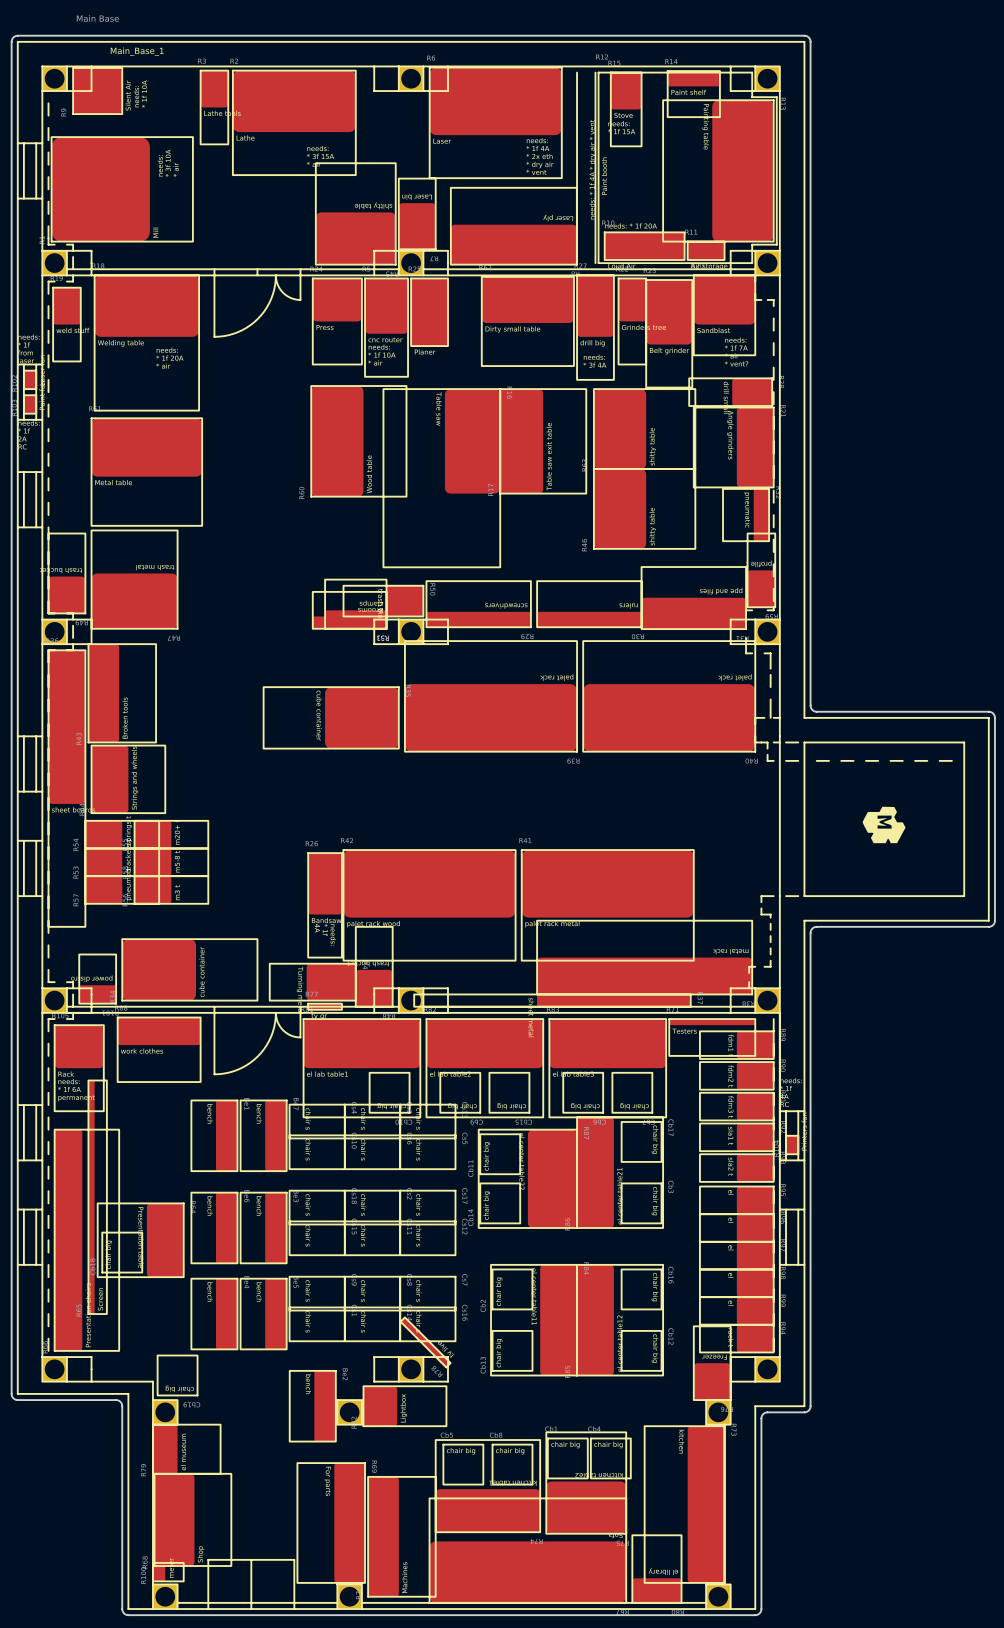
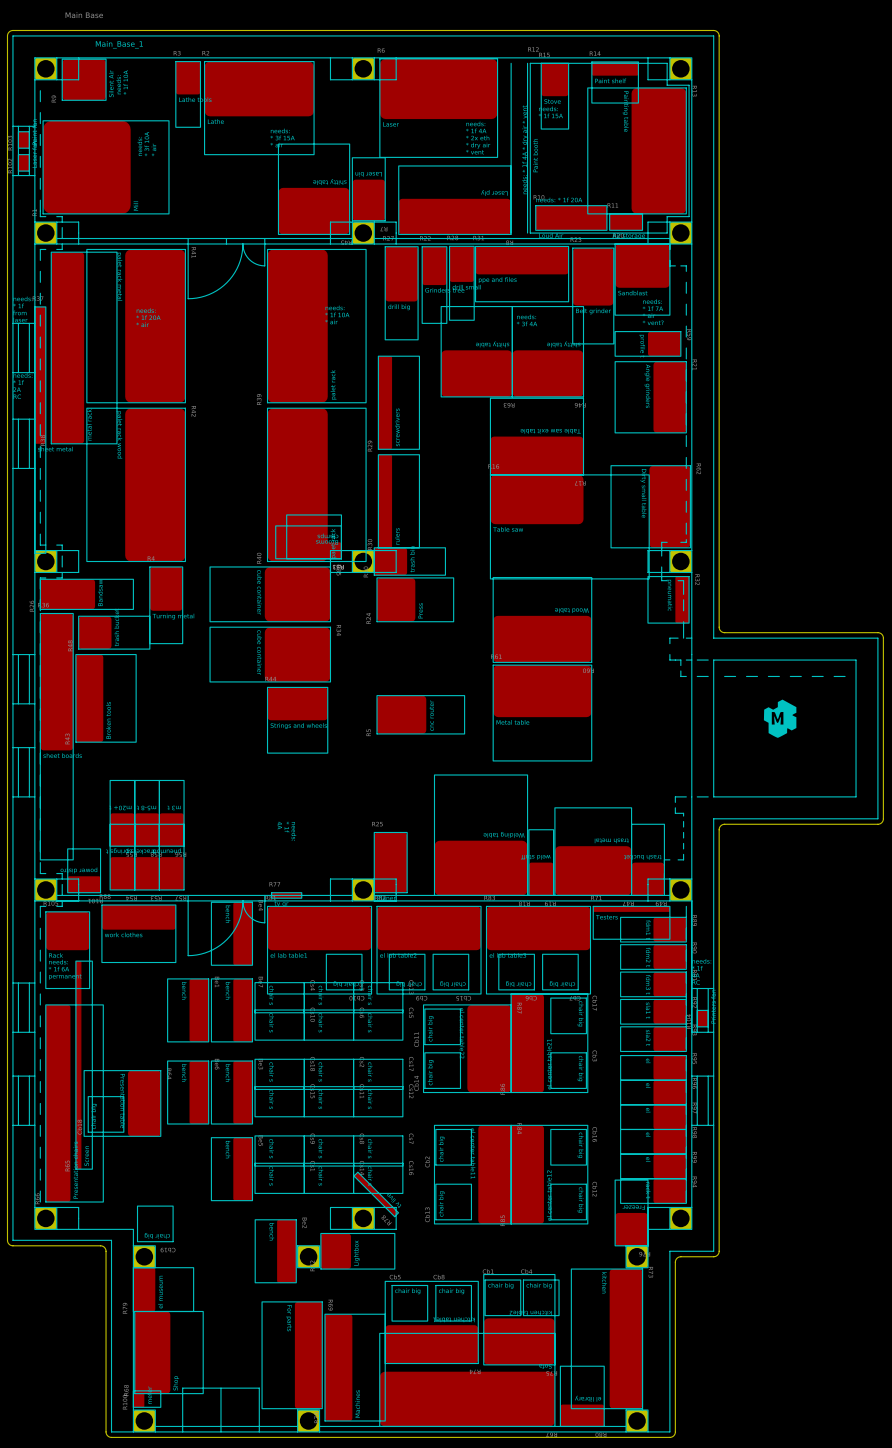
part position: (429, 312) -> (390, 862)
part rotation: 0° (337, 321) -> 90° counterclockwise (415, 599)
part position: (337, 321) -> (415, 599)
part rotation: 0° (527, 321) -> 90° clockwise (650, 506)
part position: (527, 321) -> (650, 506)
part position: (632, 321) -> (434, 285)
part rotation: 0° (66, 324) -> 180° (541, 862)
part position: (66, 324) -> (541, 862)
part rotation: 0° (386, 327) -> 90° counterclockwise (420, 714)
part position: (386, 327) -> (420, 714)
part position: (595, 327) -> (401, 293)
part rotation: 0° (146, 343) -> 180° (481, 835)
part position: (146, 343) -> (481, 835)
part position: (30, 379) -> (23, 162)
part rotation: 0° (730, 392) -> 90° counterclockwise (461, 283)
part position: (730, 392) -> (461, 283)
part position: (30, 404) -> (23, 139)
part rotation: 0° (644, 429) -> 90° counterclockwise (476, 351)
part position: (644, 429) -> (476, 351)
part rotation: 0° (358, 441) -> 90° counterclockwise (542, 619)
part position: (358, 441) -> (542, 619)
part rotation: 0° (543, 441) -> 90° counterclockwise (536, 436)
part position: (543, 441) -> (536, 436)
part position: (146, 472) -> (542, 713)
part rotation: 0° (441, 478) -> 90° counterclockwise (569, 526)
part position: (441, 478) -> (569, 526)
part rotation: 0° (644, 508) -> 90° counterclockwise (547, 351)
part position: (644, 508) -> (547, 351)
part position: (746, 515) -> (668, 599)
part rotation: 0° (761, 570) -> 90° counterclockwise (647, 343)
part position: (761, 570) -> (647, 343)
part position: (66, 573) -> (647, 859)
part position: (134, 579) -> (593, 851)
part rotation: 0° (693, 598) -> 180° (522, 274)
part position: (693, 598) -> (522, 274)
part rotation: 0° (383, 601) -> 180° (409, 561)
part position: (383, 601) -> (409, 561)
part rotation: 0° (478, 604) -> 90° clockwise (398, 402)
part position: (478, 604) -> (398, 402)
part rotation: 0° (589, 604) -> 90° clockwise (398, 501)
part position: (589, 604) -> (398, 501)
part position: (122, 693) -> (106, 698)
part rotation: 0° (491, 696) -> 90° clockwise (316, 326)
part position: (491, 696) -> (316, 326)
part rotation: 0° (669, 696) -> 90° clockwise (316, 484)
part position: (669, 696) -> (316, 484)
part position: (331, 717) -> (270, 594)
part rotation: 0° (128, 779) -> 90° clockwise (297, 720)
part position: (128, 779) -> (297, 720)
drawing: none -> [763, 699, 797, 738]
part position: (66, 788) -> (56, 736)
drawing: [862, 806, 906, 844] -> none
part rotation: 0° (122, 834) -> 90° counterclockwise (122, 857)
part position: (122, 834) -> (122, 857)
part rotation: 0° (171, 834) -> 90° counterclockwise (122, 813)
part position: (171, 834) -> (122, 813)
part rotation: 0° (122, 862) -> 90° counterclockwise (147, 857)
part position: (122, 862) -> (147, 857)
part rotation: 0° (171, 862) -> 90° counterclockwise (147, 813)
part position: (171, 862) -> (147, 813)
part rotation: 0° (122, 889) -> 90° counterclockwise (171, 857)
part position: (122, 889) -> (171, 857)
part rotation: 0° (171, 889) -> 90° counterclockwise (171, 813)
part rotation: 0° (325, 905) -> 90° counterclockwise (86, 594)
part position: (325, 905) -> (86, 594)
part rotation: 0° (429, 905) -> 90° clockwise (136, 484)
part position: (429, 905) -> (136, 484)
part rotation: 0° (607, 905) -> 90° clockwise (136, 326)
part position: (607, 905) -> (136, 326)
part rotation: 0° (644, 957) -> 90° clockwise (84, 348)
part position: (644, 957) -> (84, 348)
part rotation: 0° (374, 966) -> 90° clockwise (114, 632)
part position: (374, 966) -> (114, 632)
part rotation: 0° (189, 969) -> 180° (270, 654)
part position: (189, 969) -> (270, 654)
part rotation: 0° (312, 982) -> 90° counterclockwise (166, 605)
part position: (312, 982) -> (166, 605)
part rotation: 0° (552, 1000) -> 90° counterclockwise (40, 430)
part position: (552, 1000) -> (40, 430)
part position: (214, 1314) -> (231, 933)

